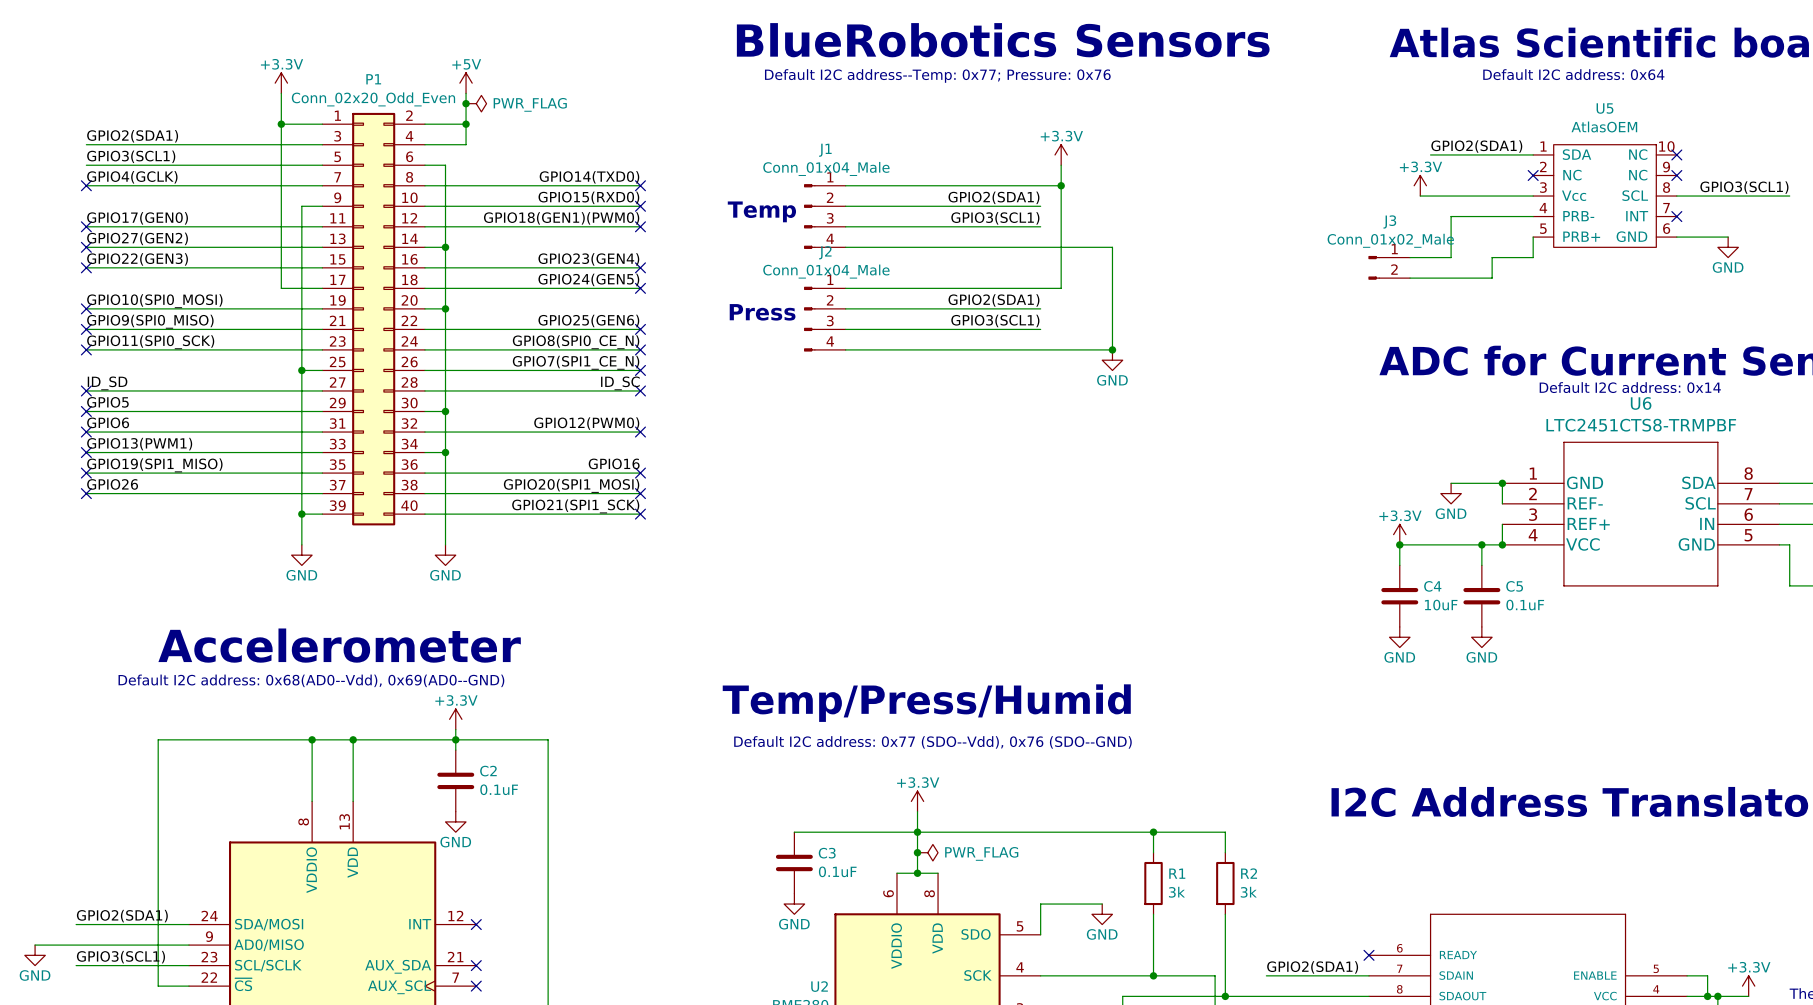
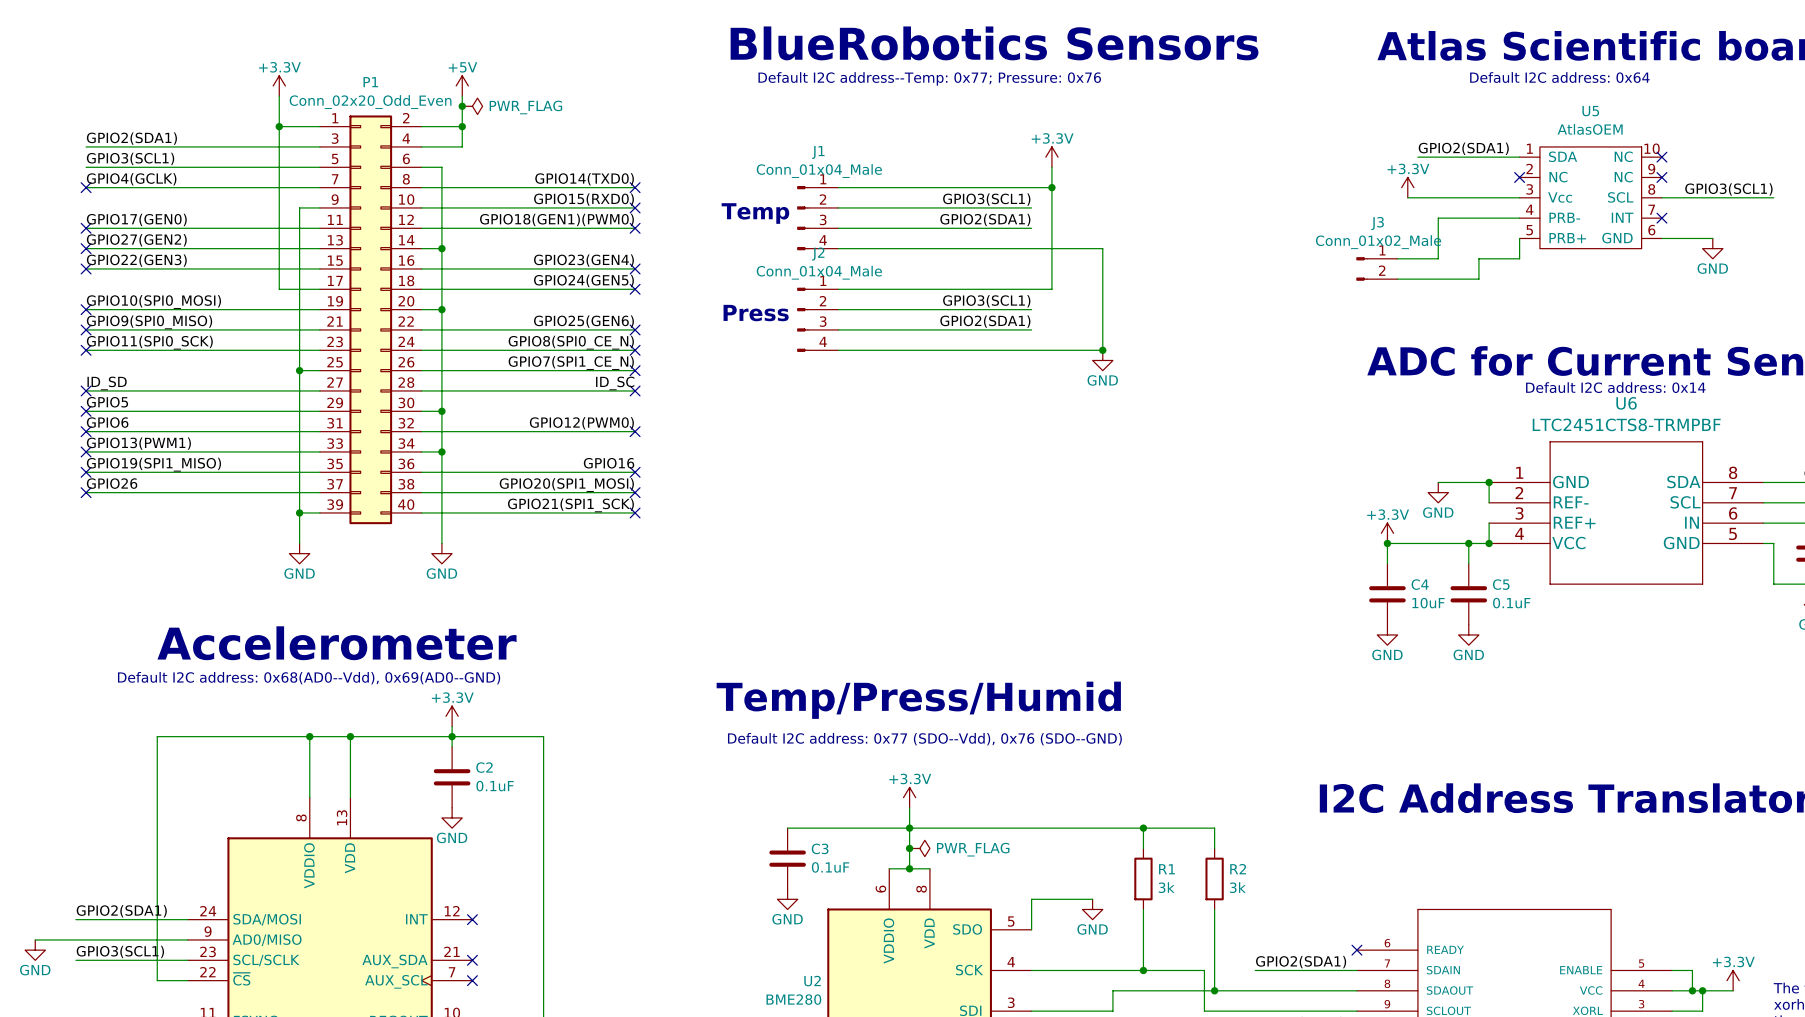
label: GPIO2(SDA1) (993, 197) -> GPIO3(SCL1) (986, 199)
label: GPIO3(SCL1) (995, 218) -> GPIO2(SDA1) (985, 219)
label: GPIO2(SDA1) (993, 300) -> GPIO3(SCL1) (986, 301)
label: GPIO3(SCL1) (995, 320) -> GPIO2(SDA1) (985, 321)

